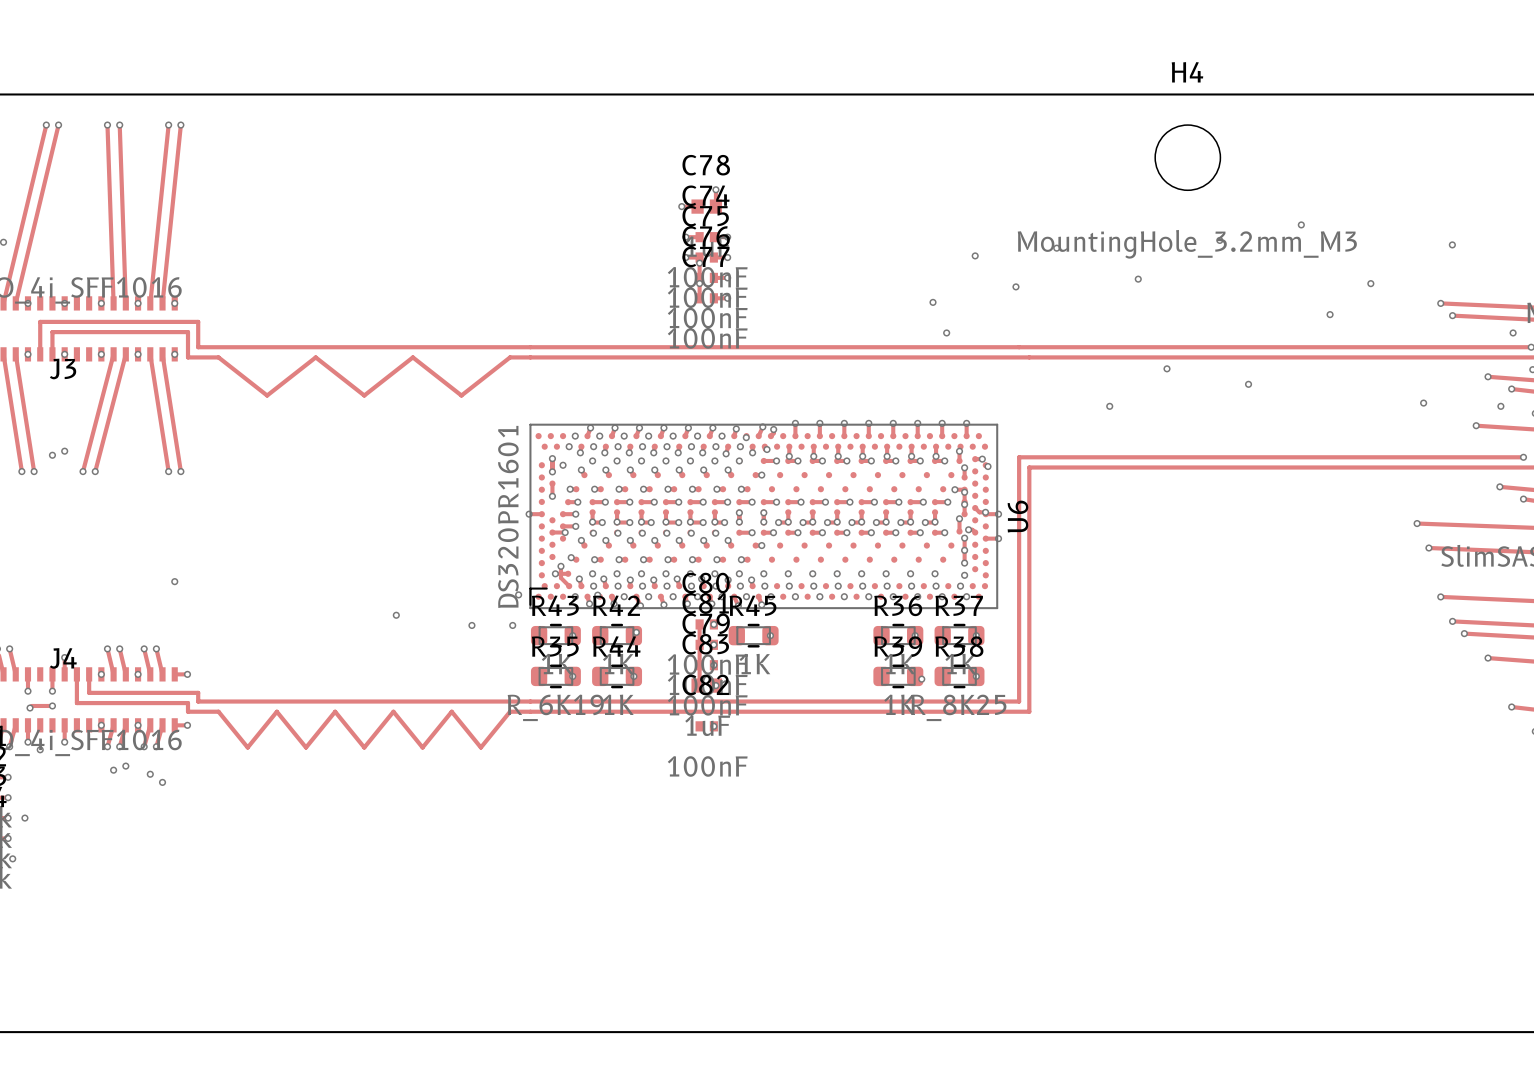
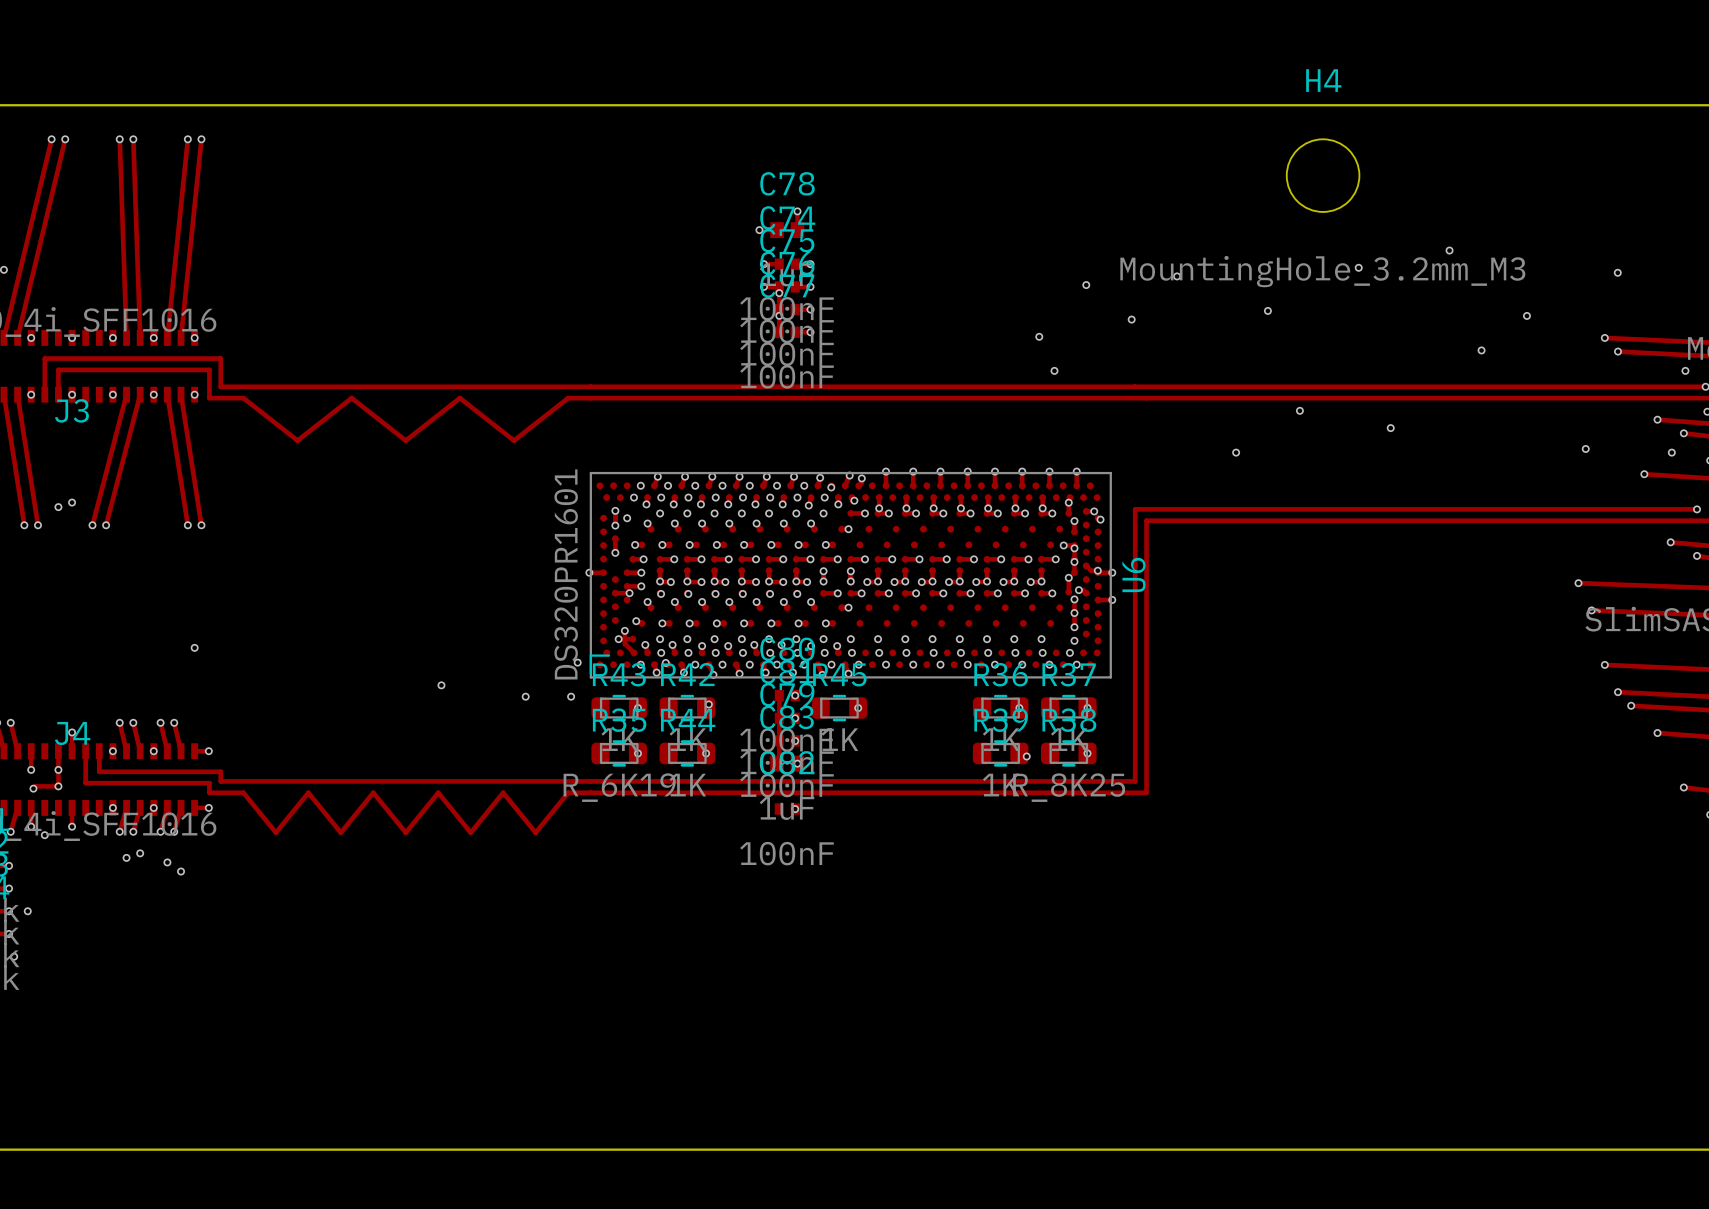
track: none -> (58, 770) (58, 786)

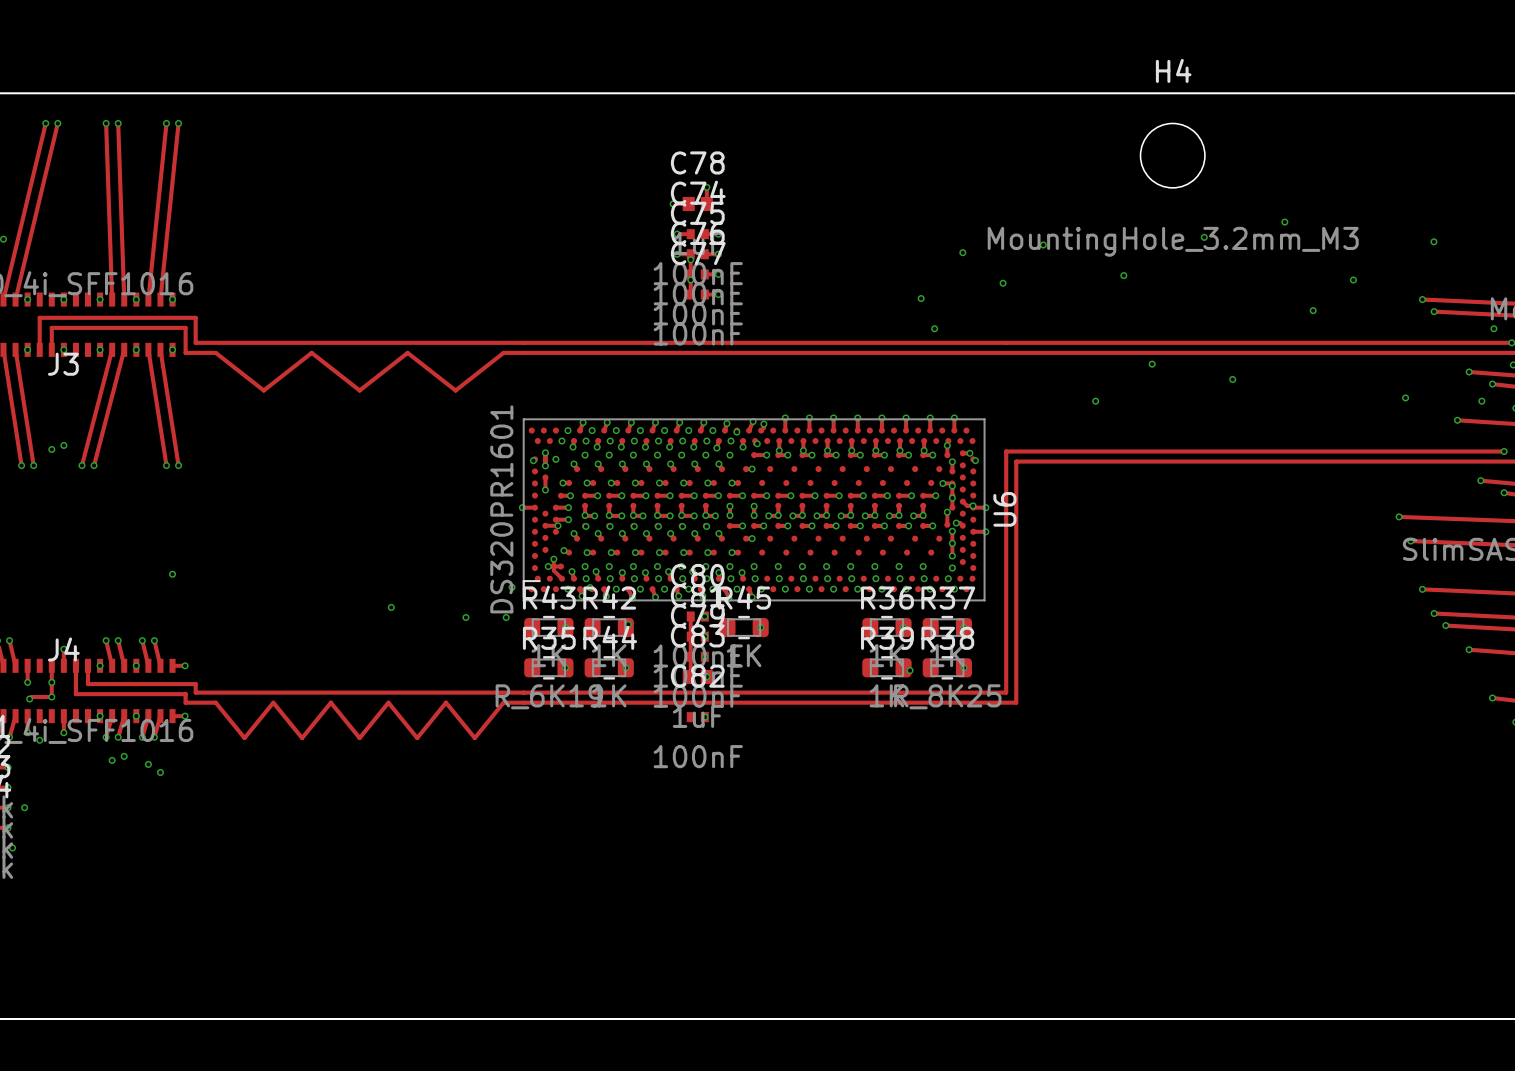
via: none -> (533, 460)

